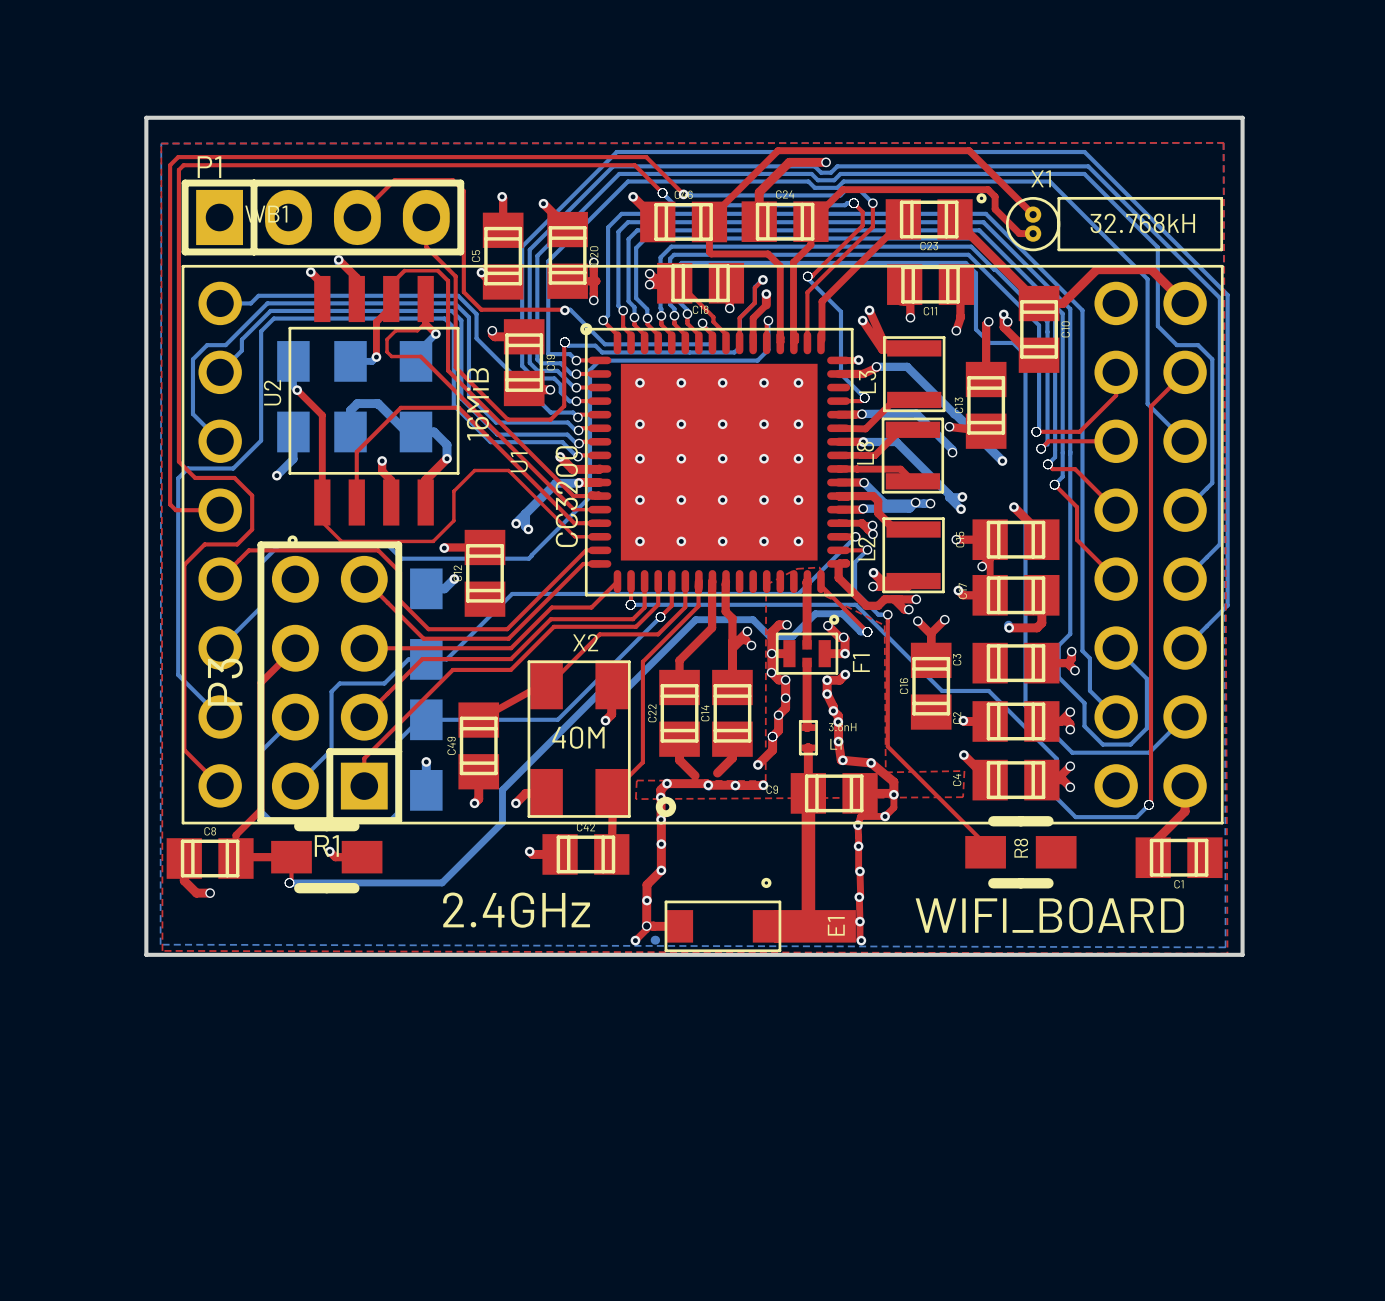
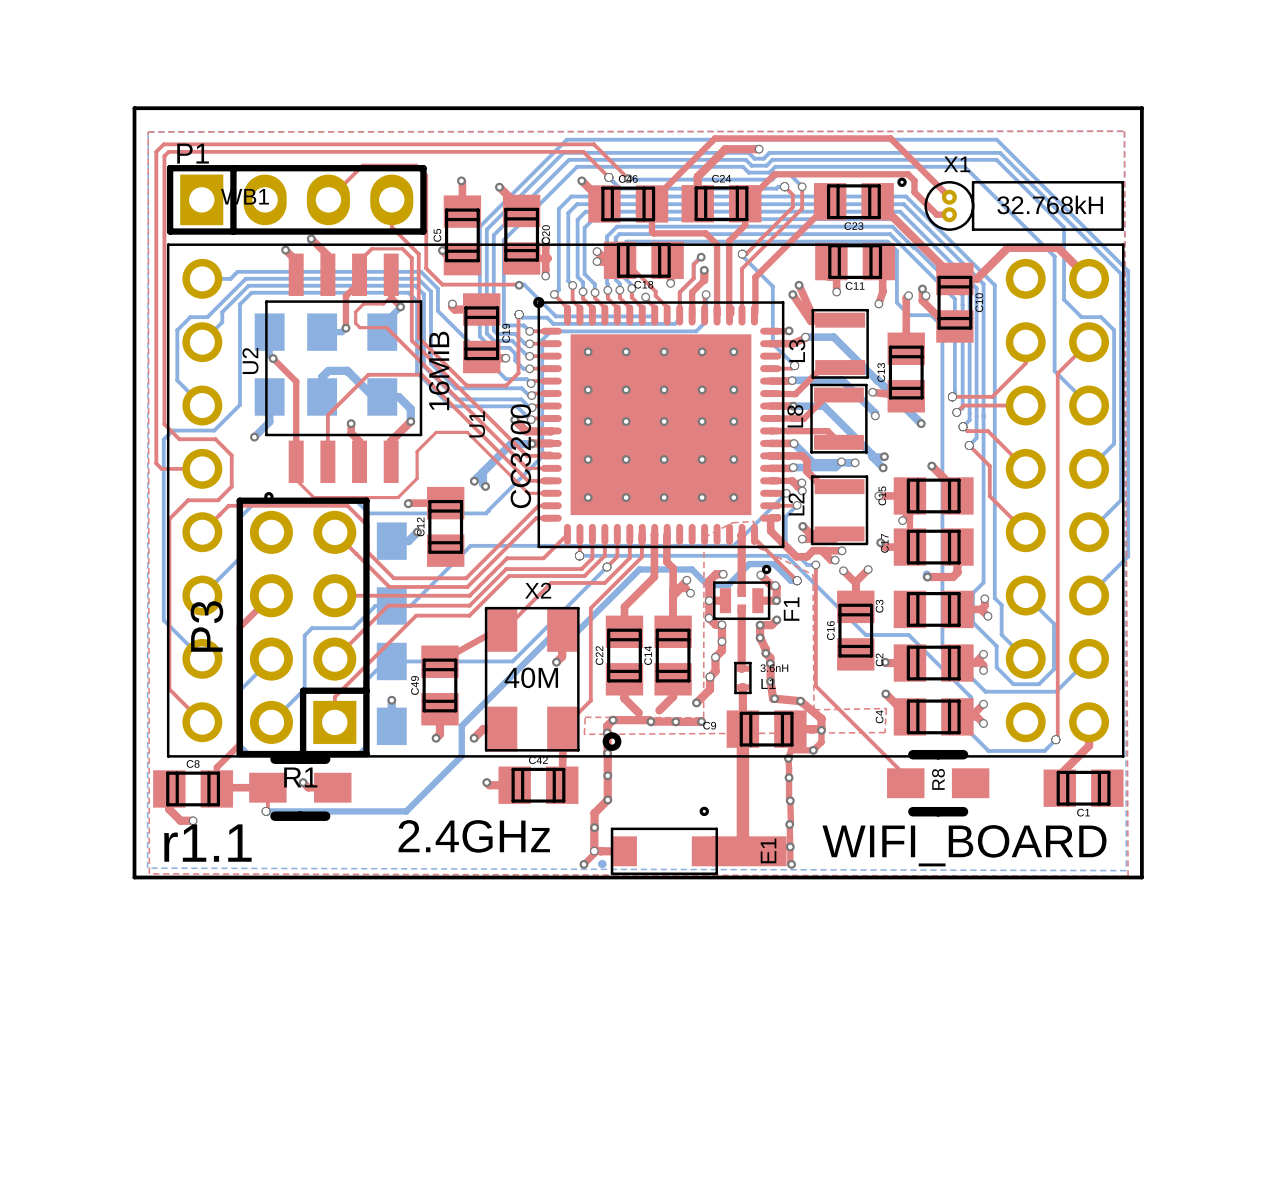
text: none -> r1.1 (207, 843)

